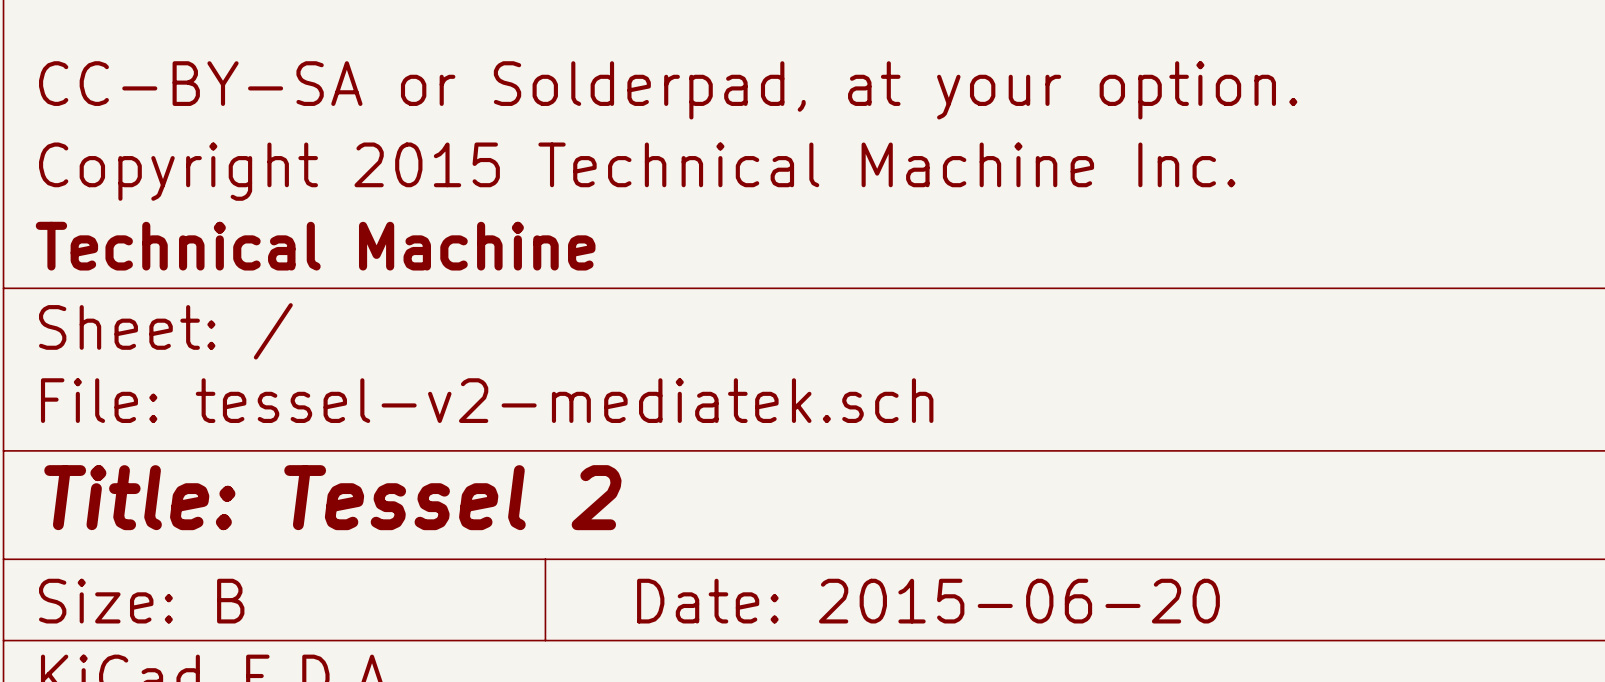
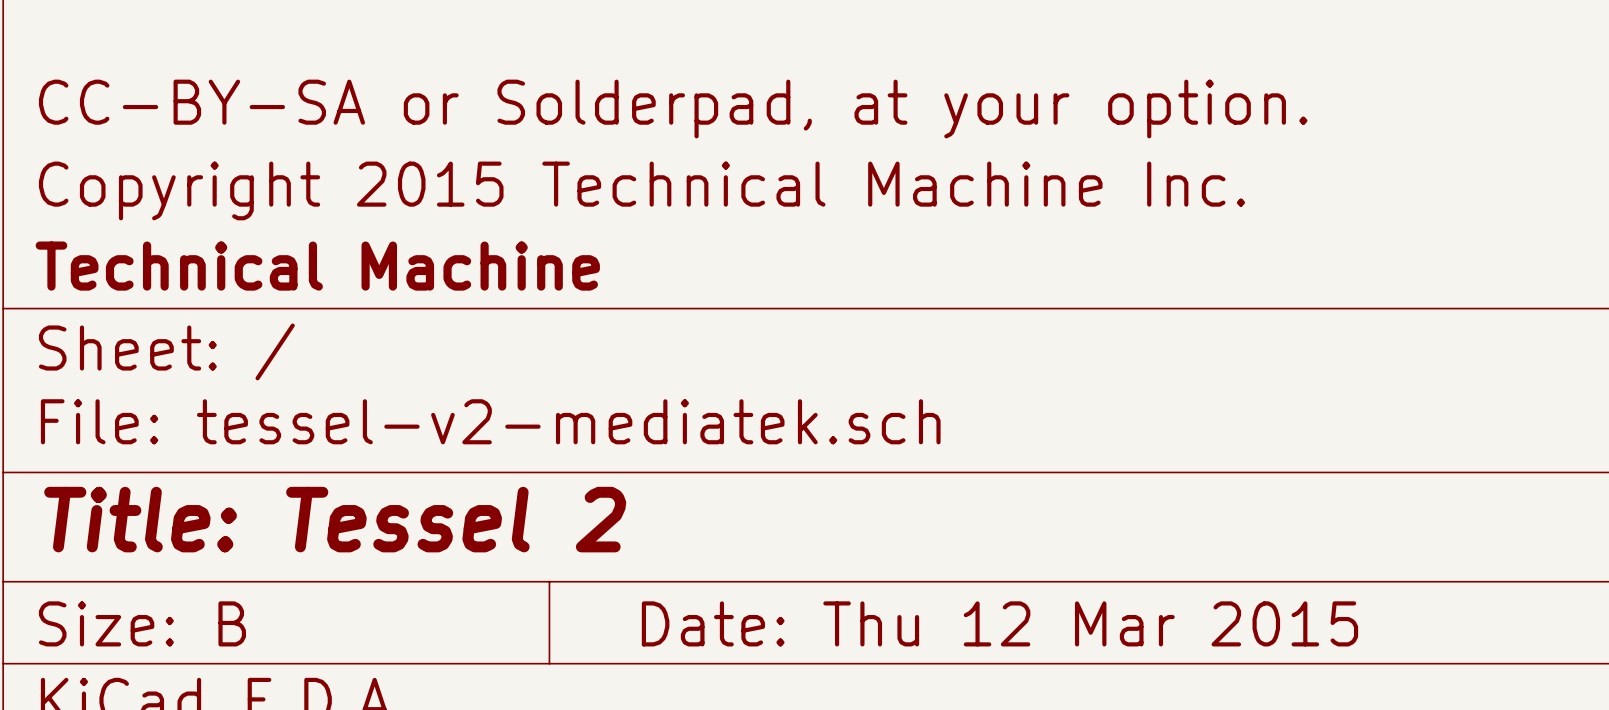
title block: Date: 2015-06-20 (928, 601) -> Date: Thu 12 Mar 2015 (999, 623)

